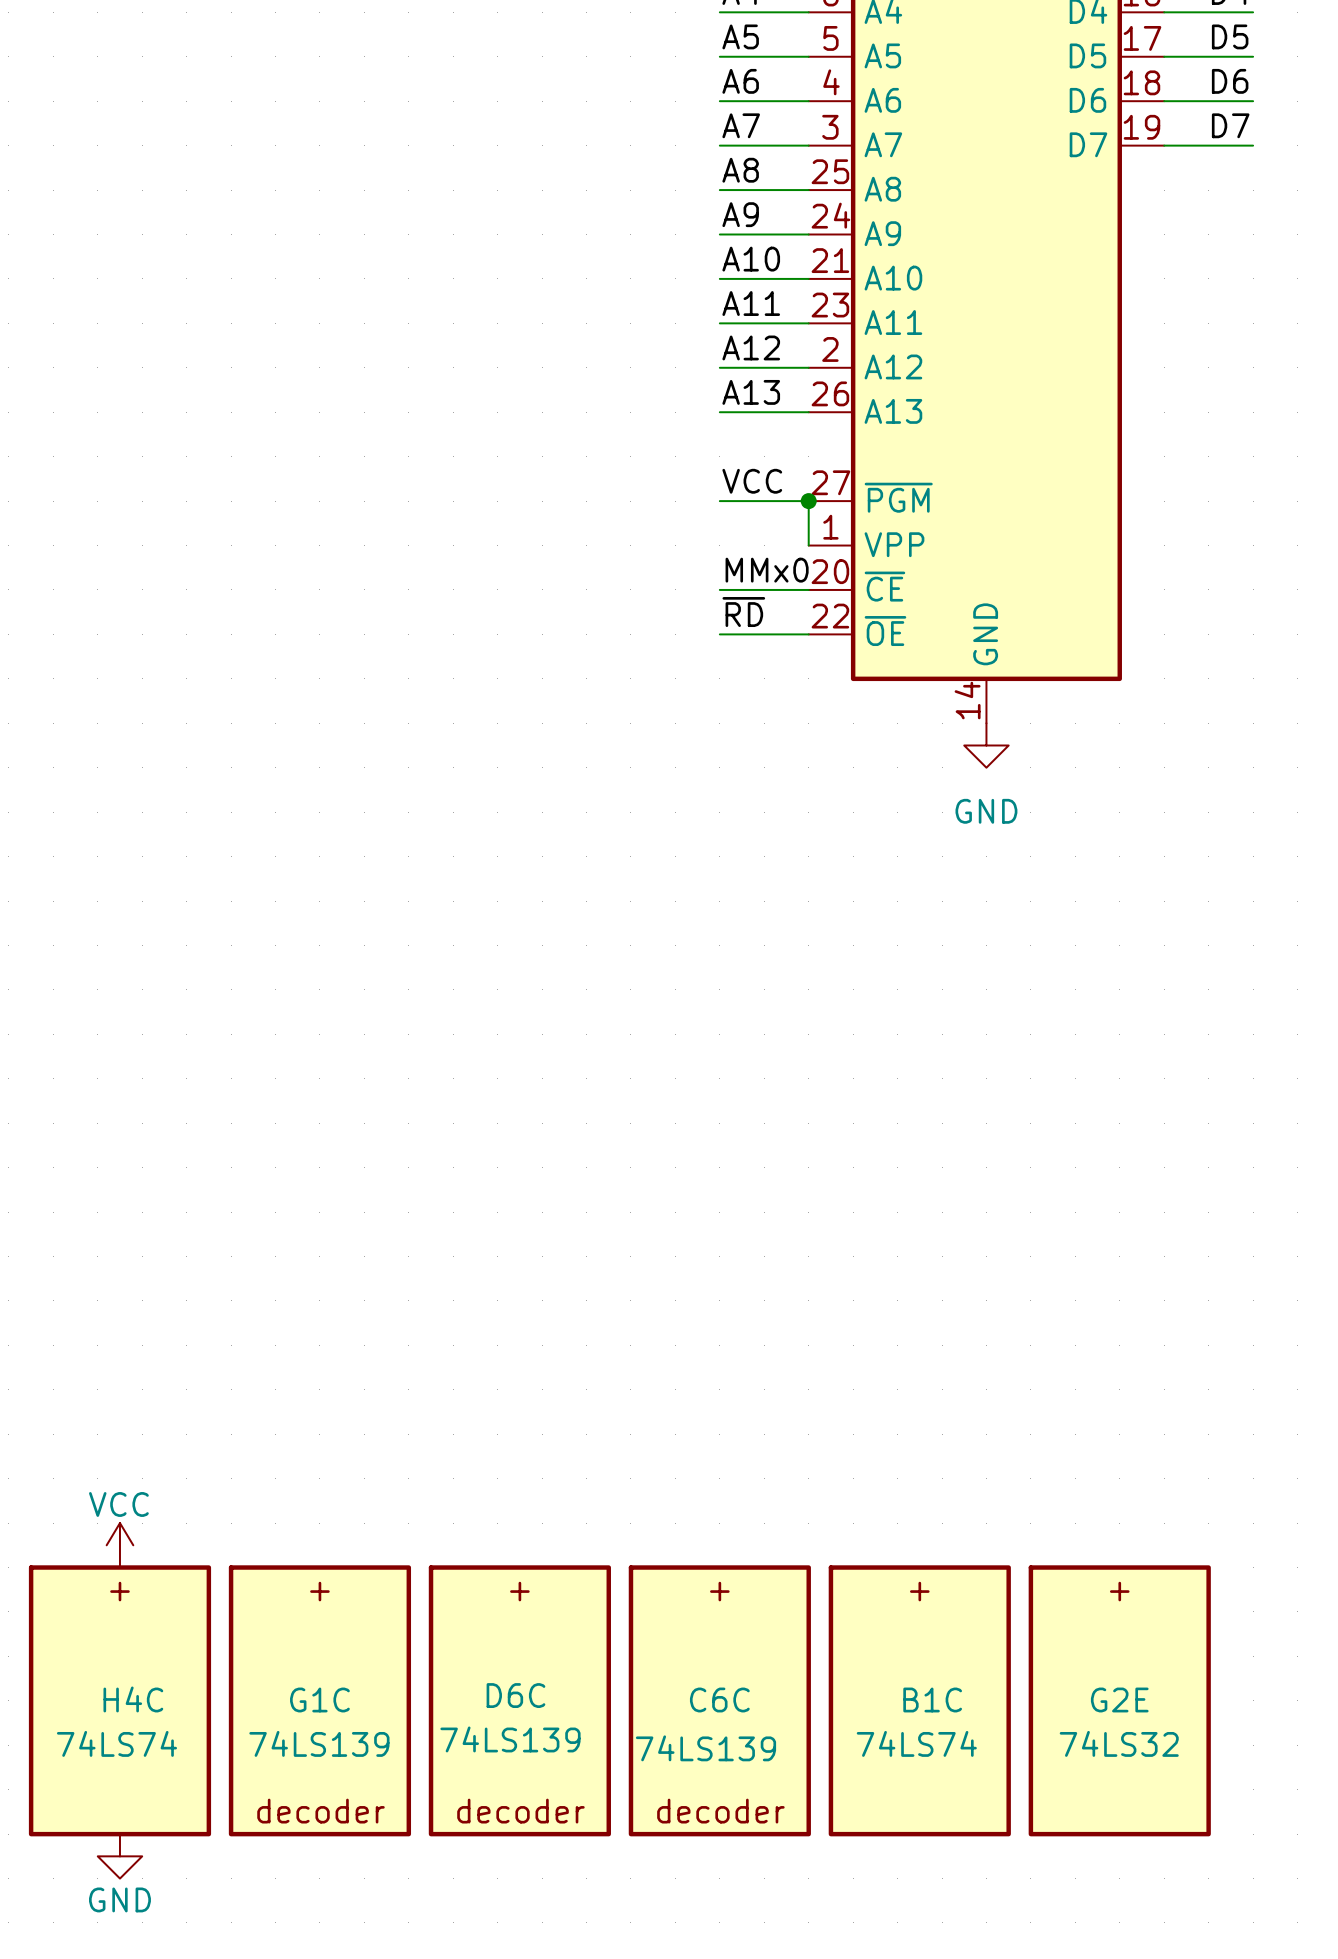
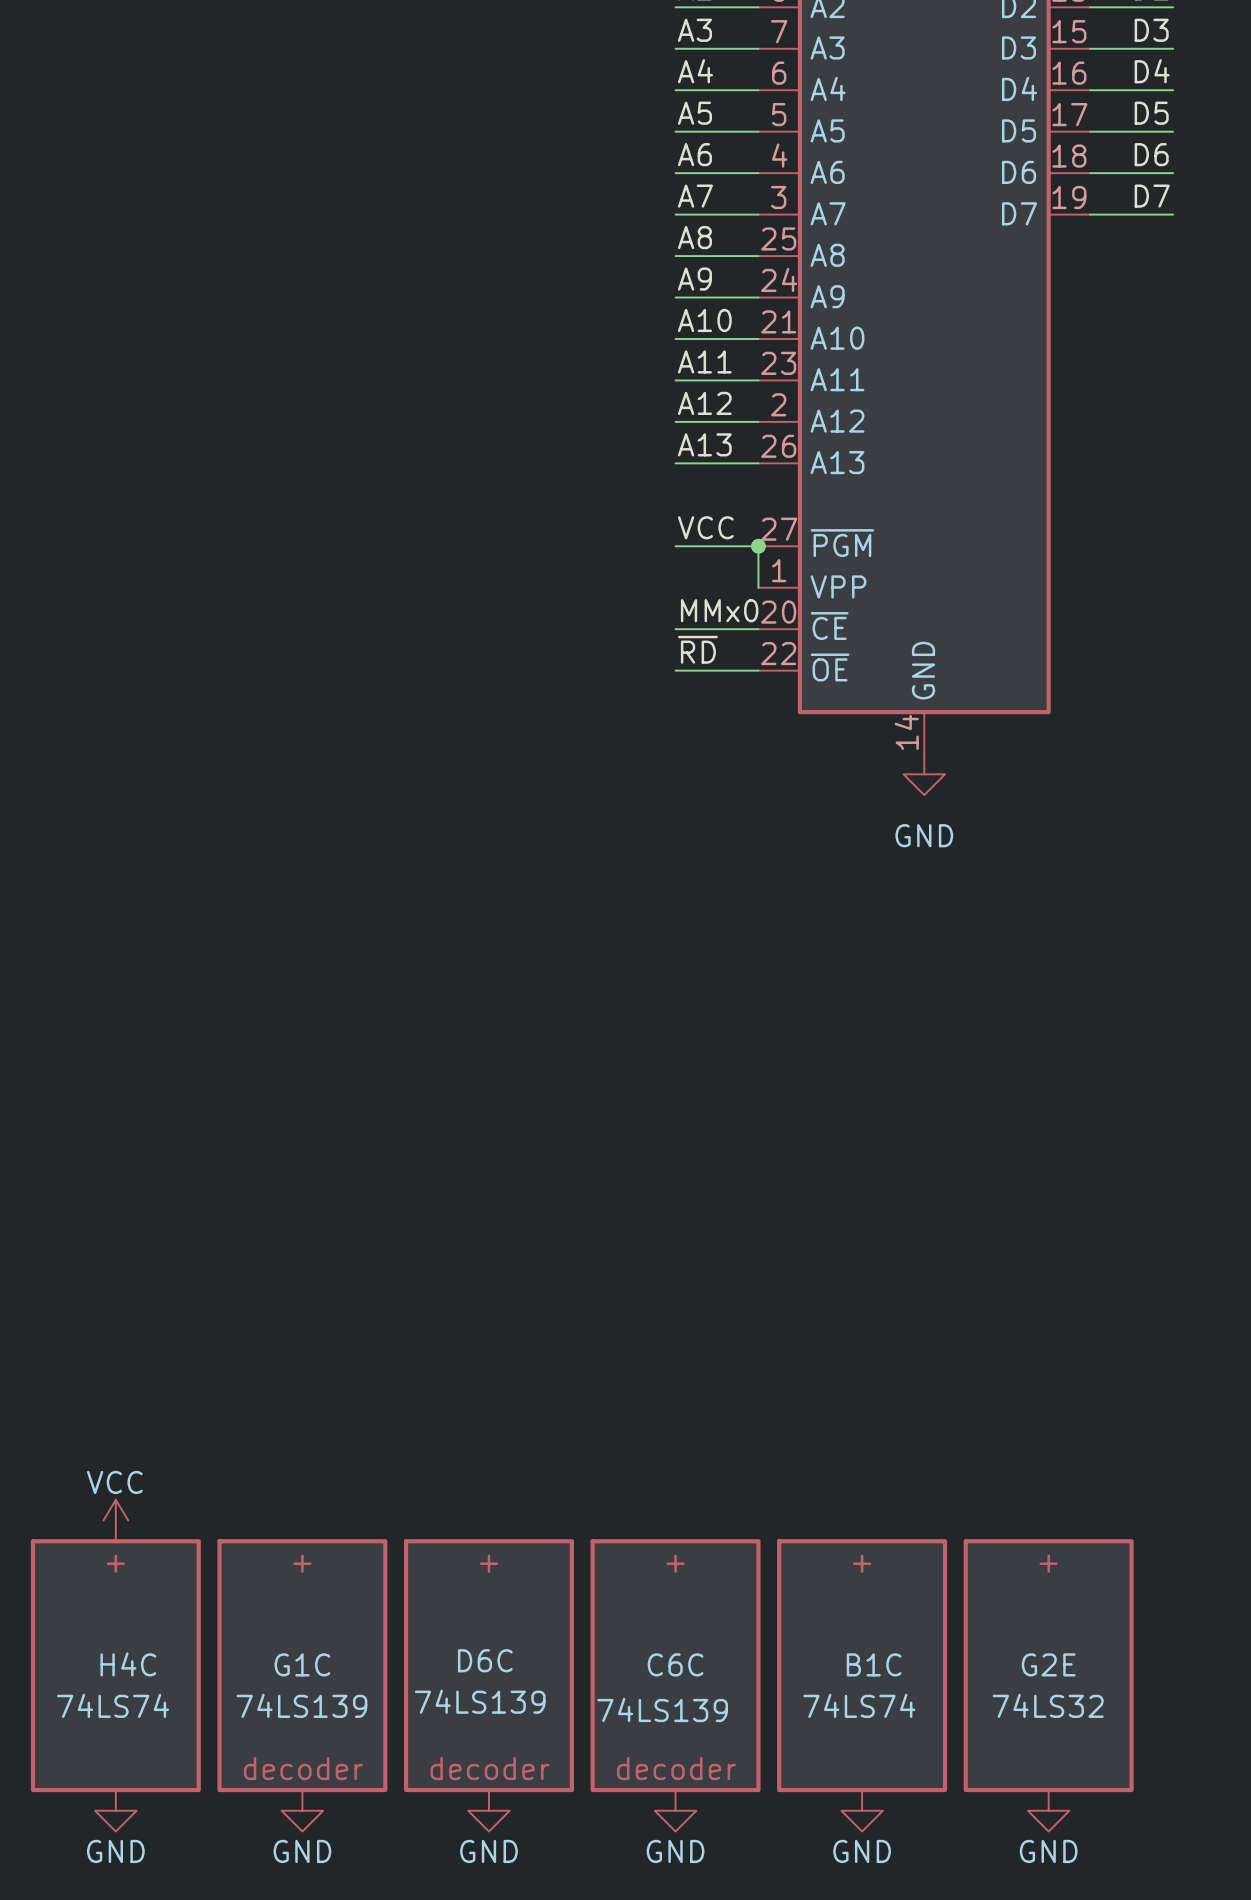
power symbol: none -> GND (302, 1810)
power symbol: none -> GND (488, 1810)
power symbol: none -> GND (675, 1810)
power symbol: none -> GND (862, 1810)
power symbol: none -> GND (1048, 1810)

